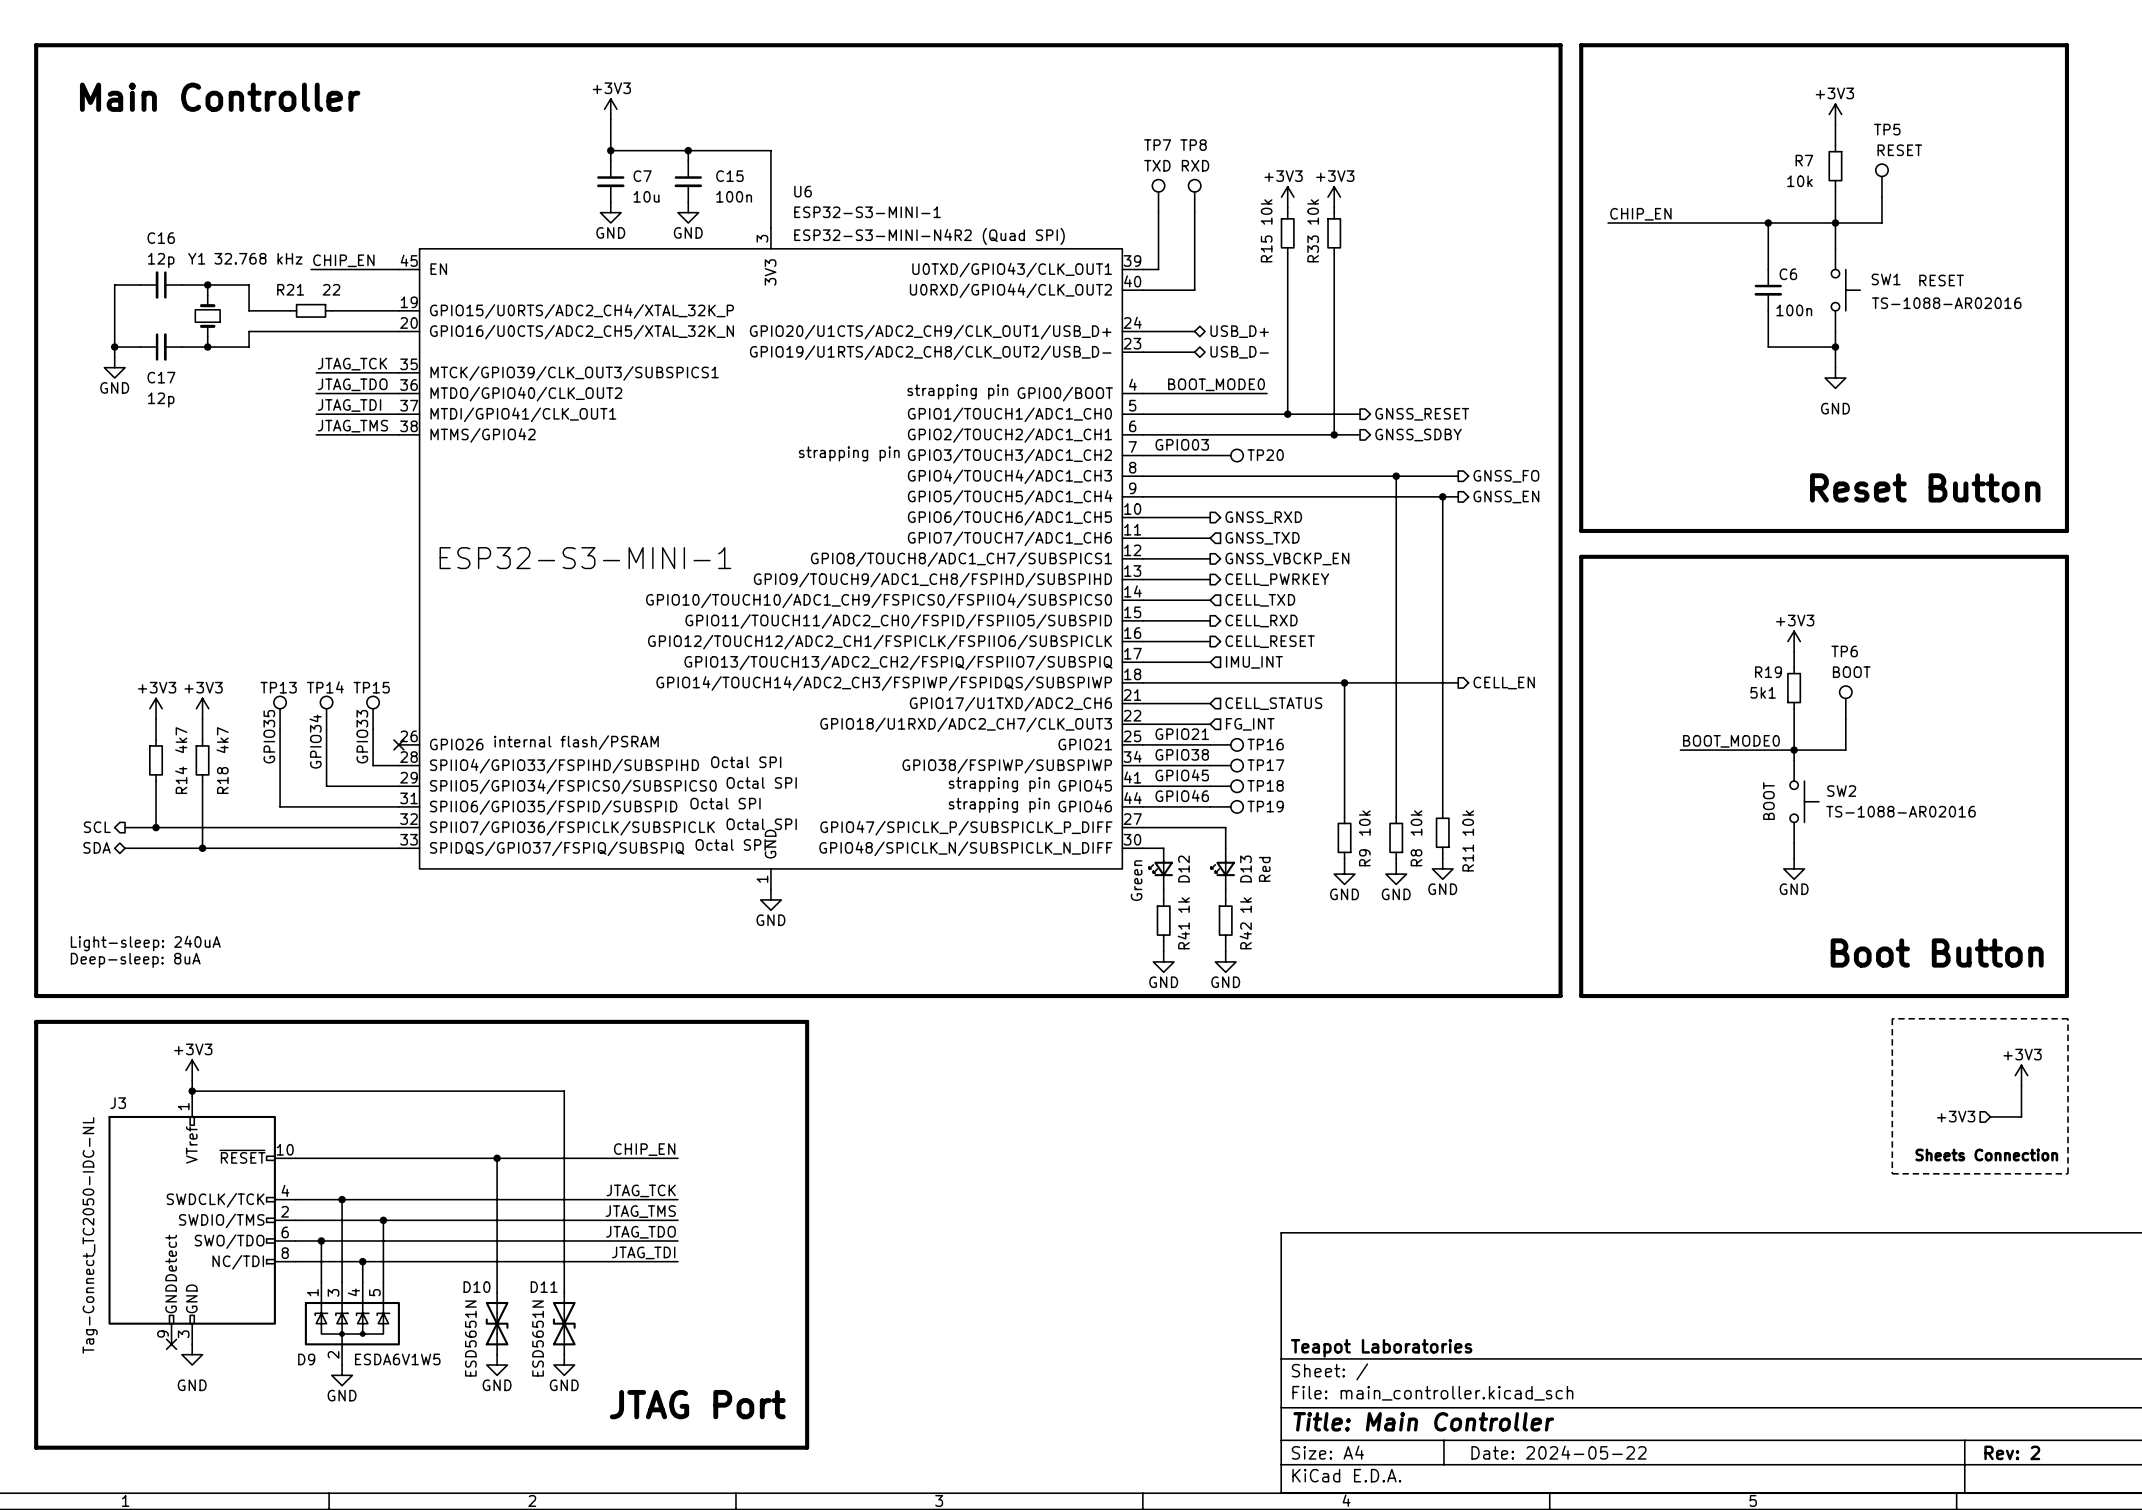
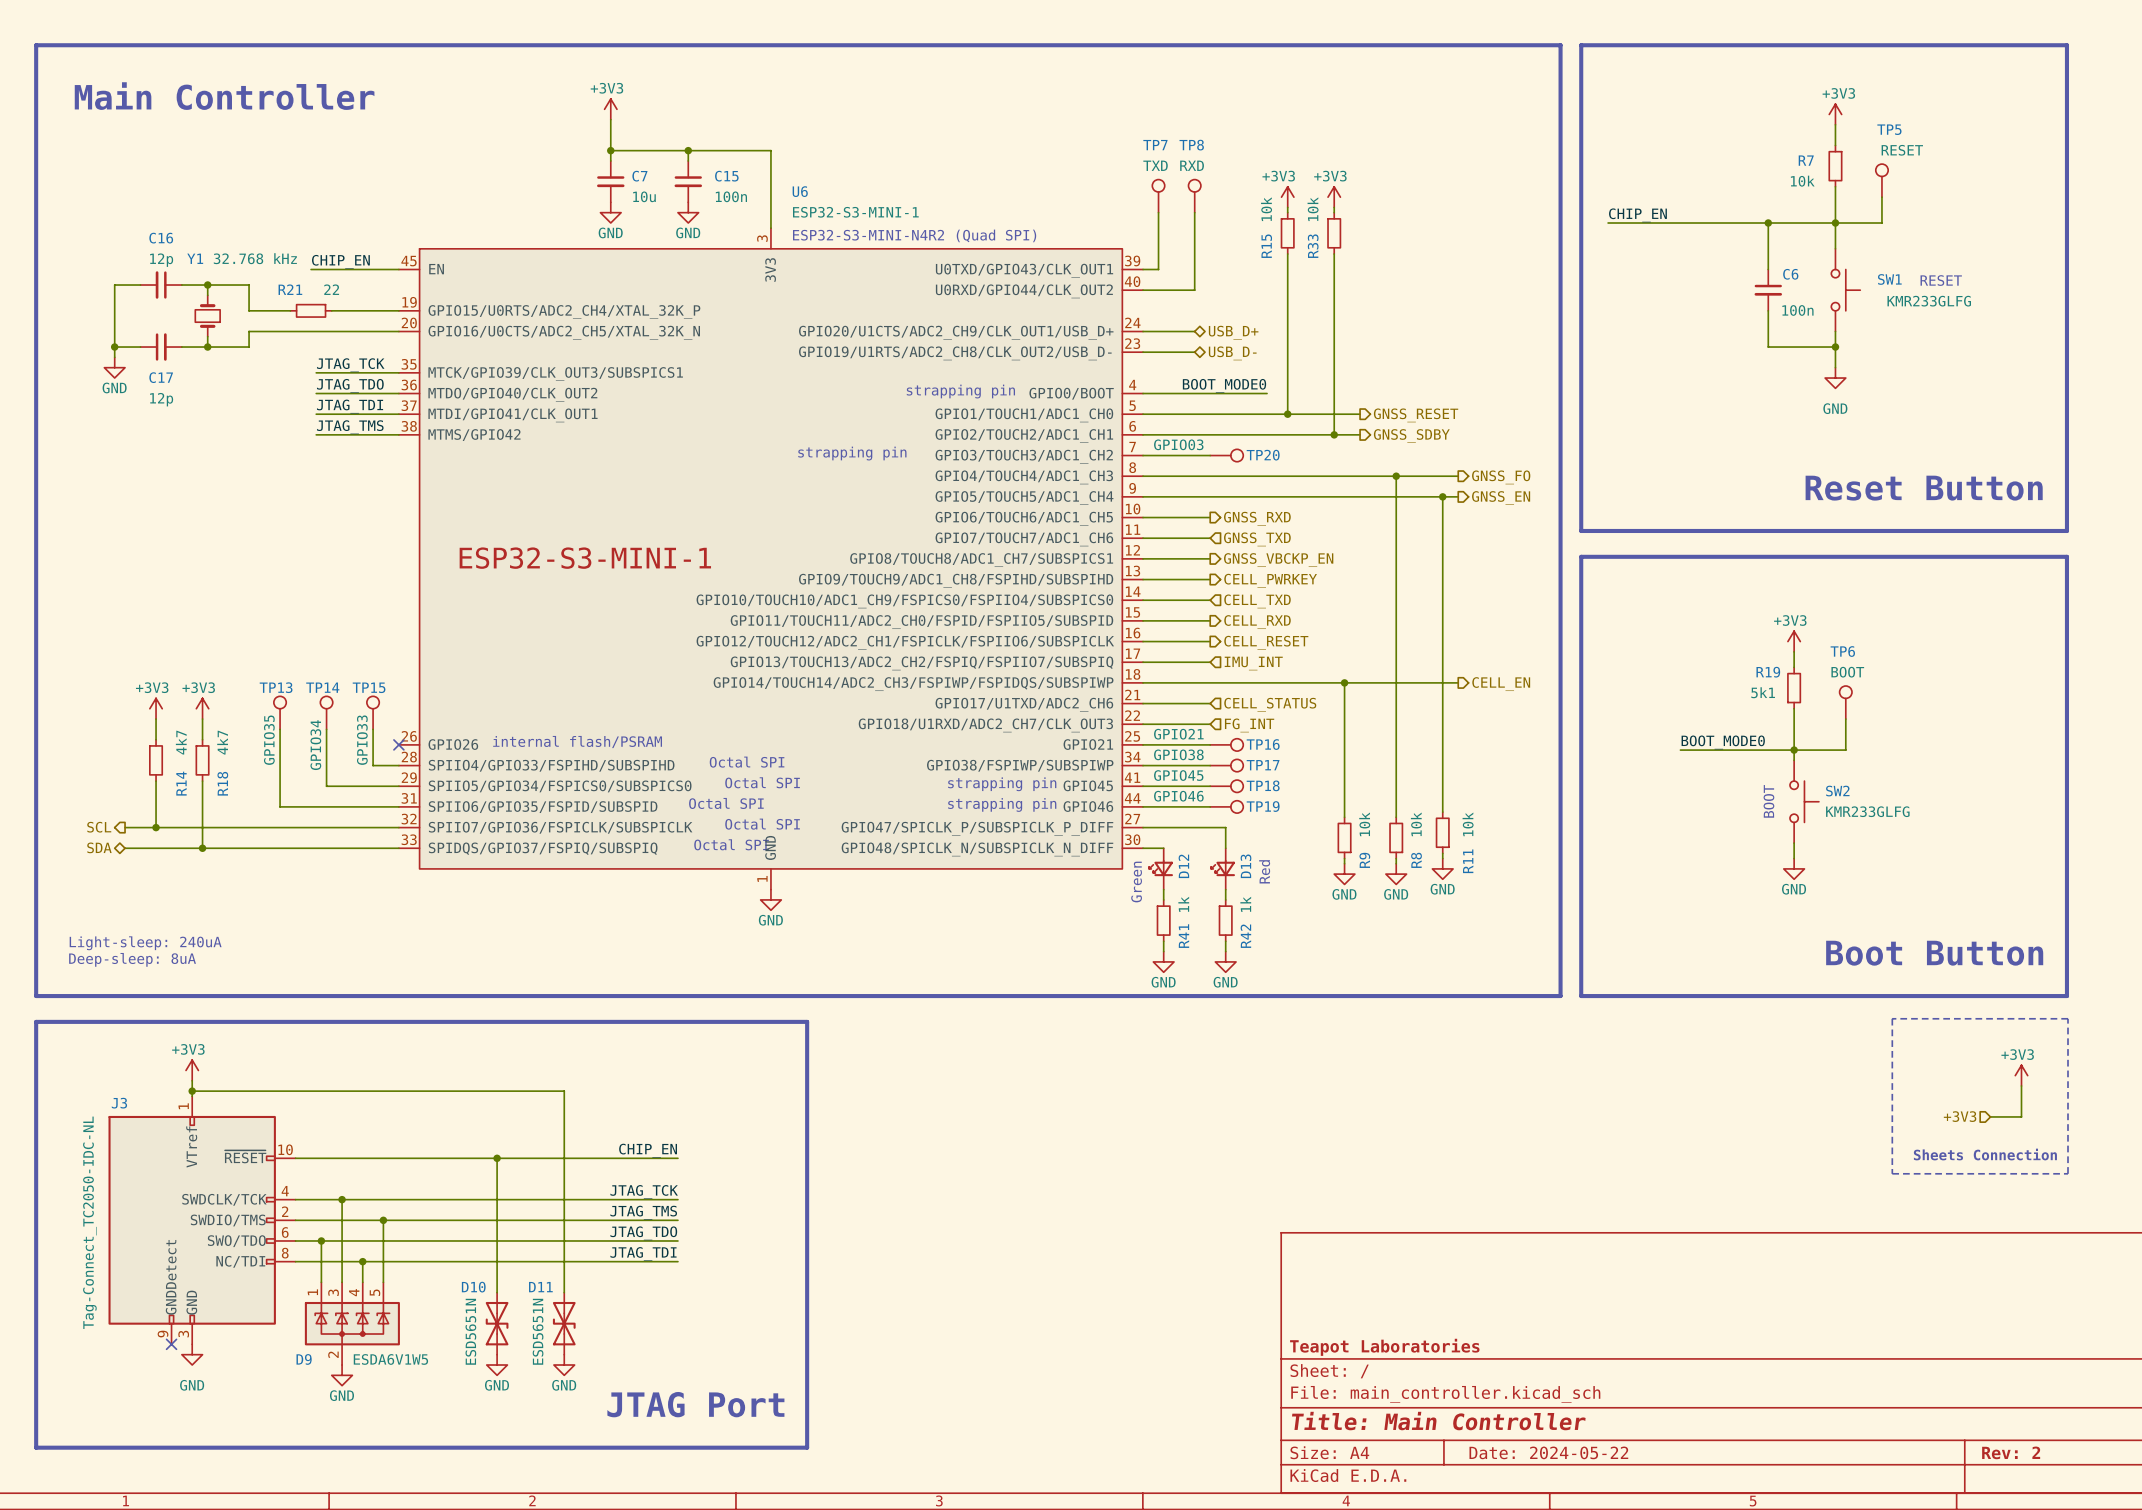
SW1 value: TS-1088-AR02016 (1946, 303) -> KMR233GLFG (1929, 301)
SW2 value: TS-1088-AR02016 (1900, 811) -> KMR233GLFG (1867, 811)

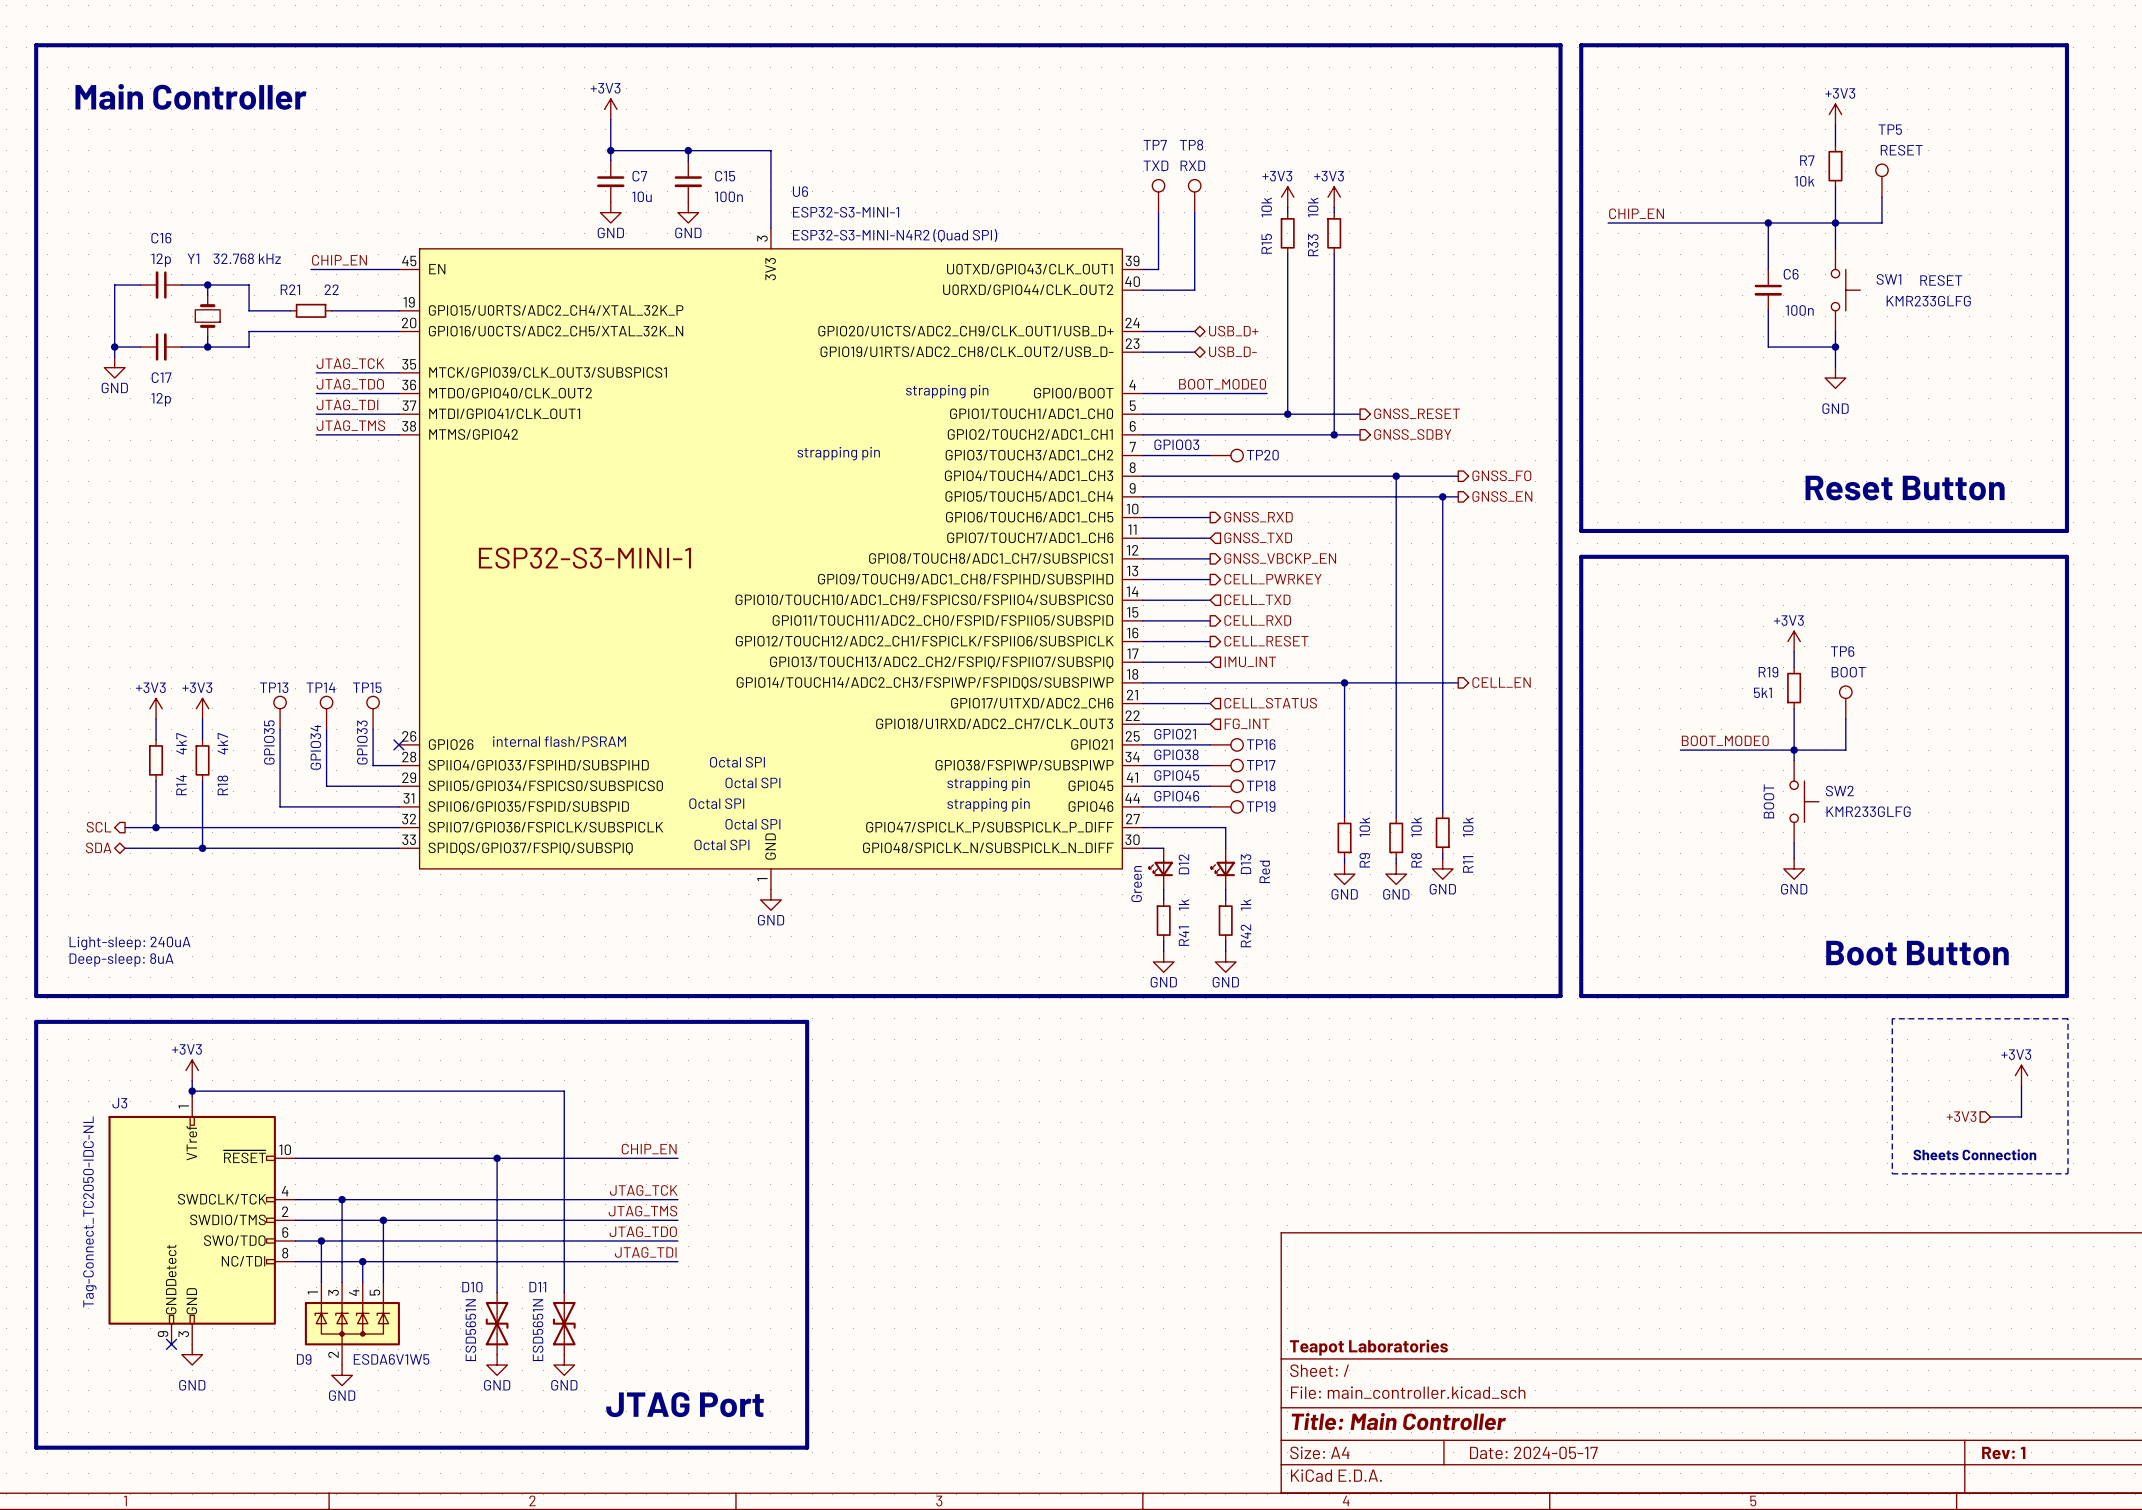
title block: Date: 2024-05-22 (1548, 1452) -> Date: 2024-05-17 (1533, 1452)
title block: Rev: 2 (2011, 1452) -> Rev: 1 (2003, 1452)

